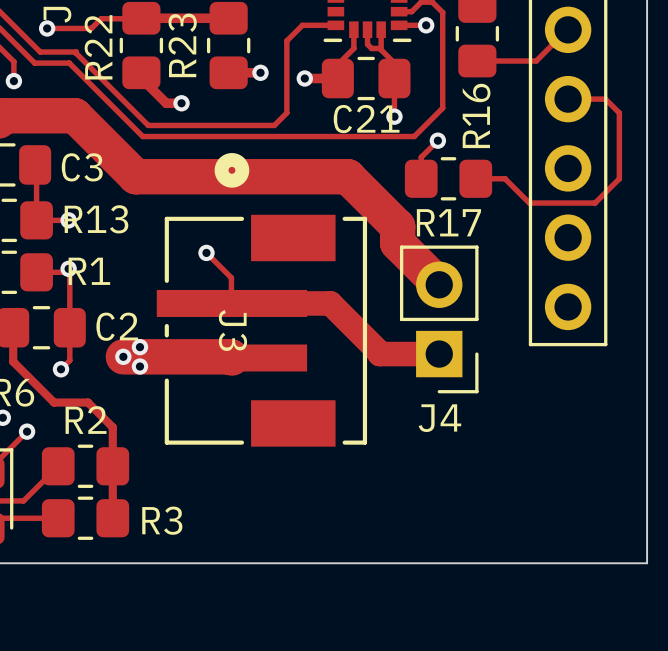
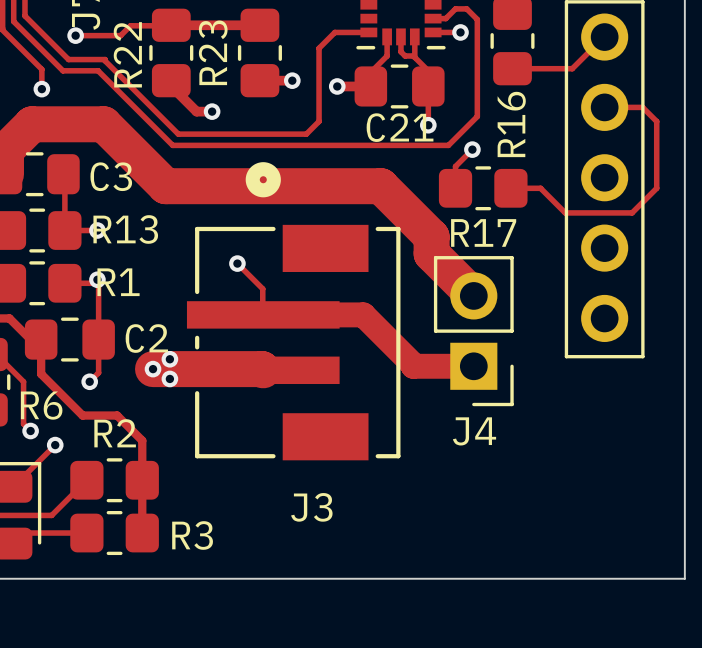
J3 name rotation: 0° (232, 330) -> 90° counterclockwise (311, 507)
J3 name position: J3 (232, 330) -> J3 (311, 507)

